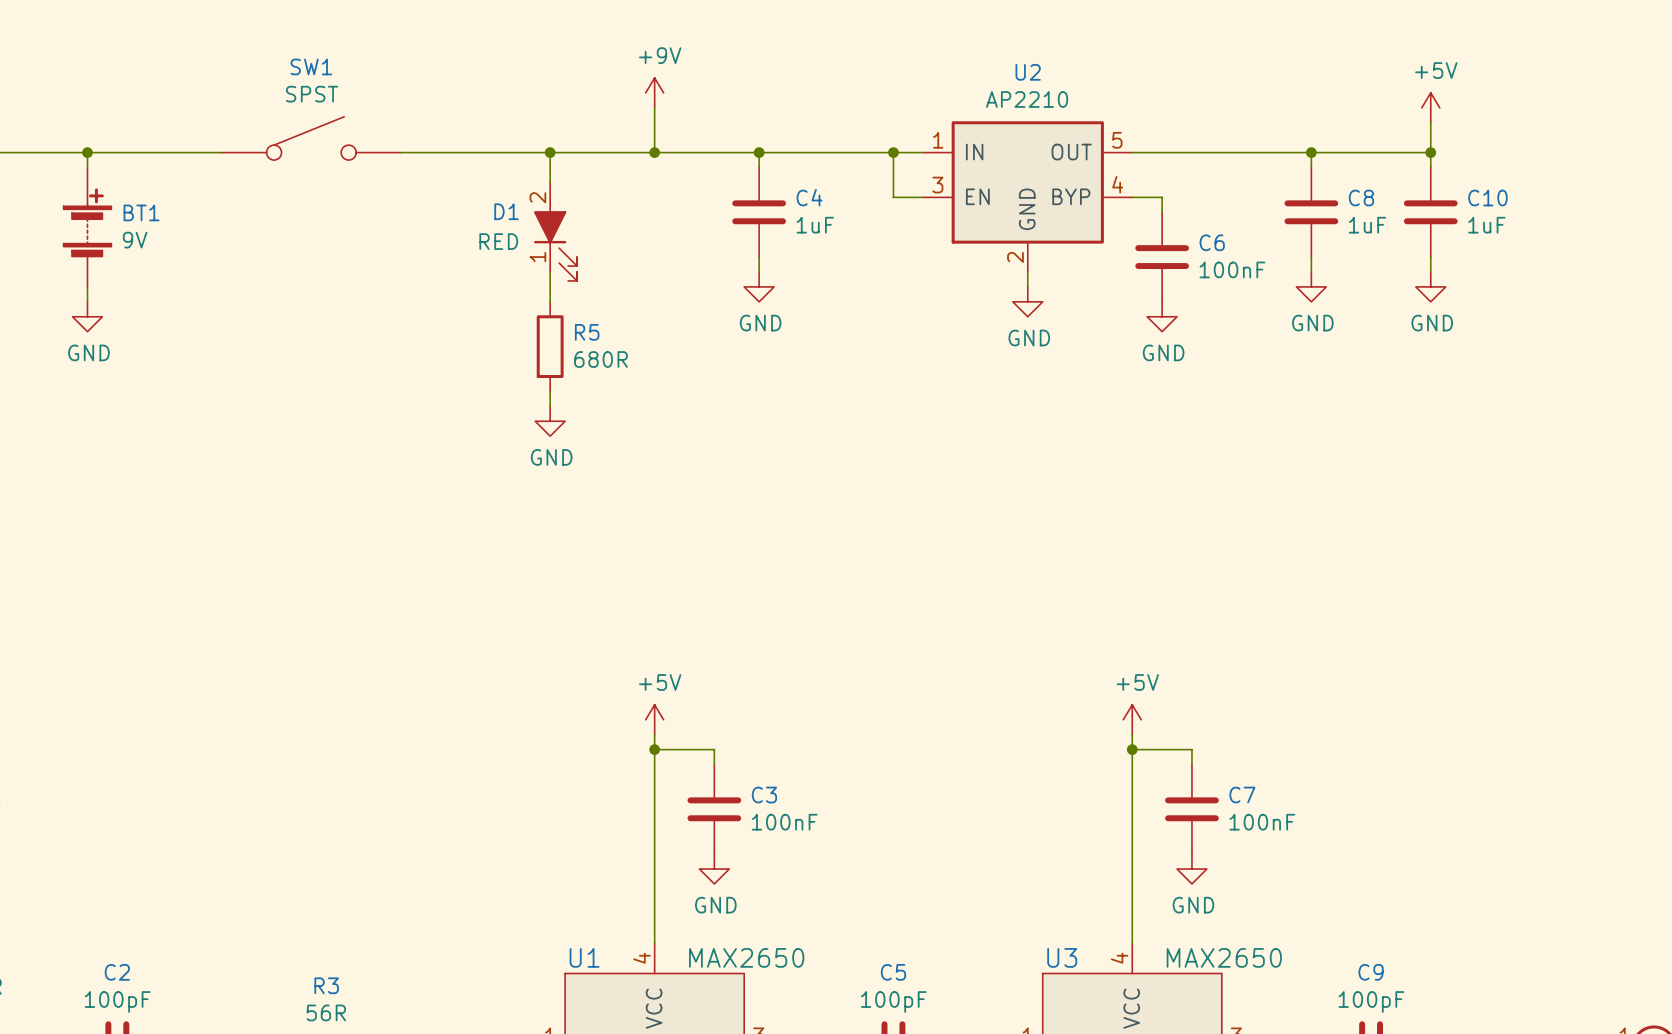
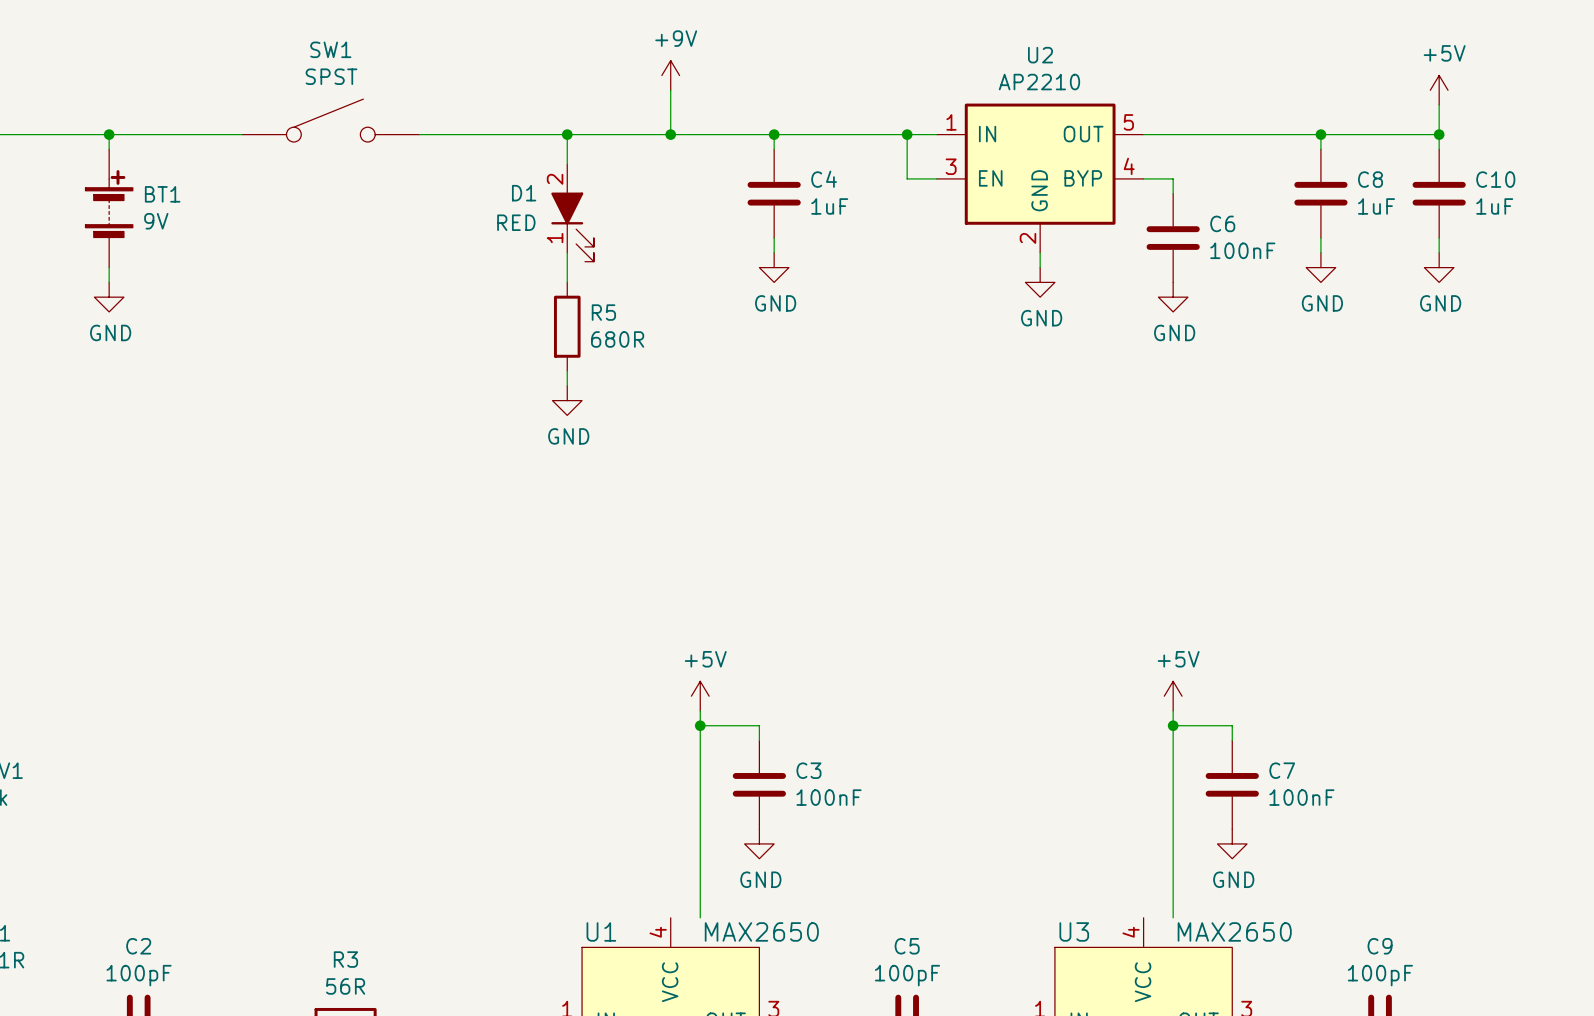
power symbol position: +5V (654, 719) -> +5V (700, 696)
power symbol position: +5V (1132, 719) -> +5V (1173, 696)
wire: (654, 734) (654, 943) -> (700, 710) (700, 917)
wire: (1132, 734) (1132, 943) -> (1173, 710) (1173, 917)
wire: (654, 749) (684, 749) -> none
junction position: (654, 749) -> (700, 725)
wire: (714, 749) (714, 764) -> (729, 725) (759, 725) (759, 740)
wire: (1132, 749) (1162, 749) -> none
junction position: (1132, 749) -> (1173, 725)
wire: (1191, 749) (1191, 764) -> (1202, 725) (1232, 725) (1232, 740)
C3 position: (714, 809) -> (759, 784)
C7 position: (1191, 809) -> (1232, 784)
power symbol position: GND (714, 869) -> GND (759, 843)
power symbol position: GND (1191, 869) -> GND (1232, 843)

